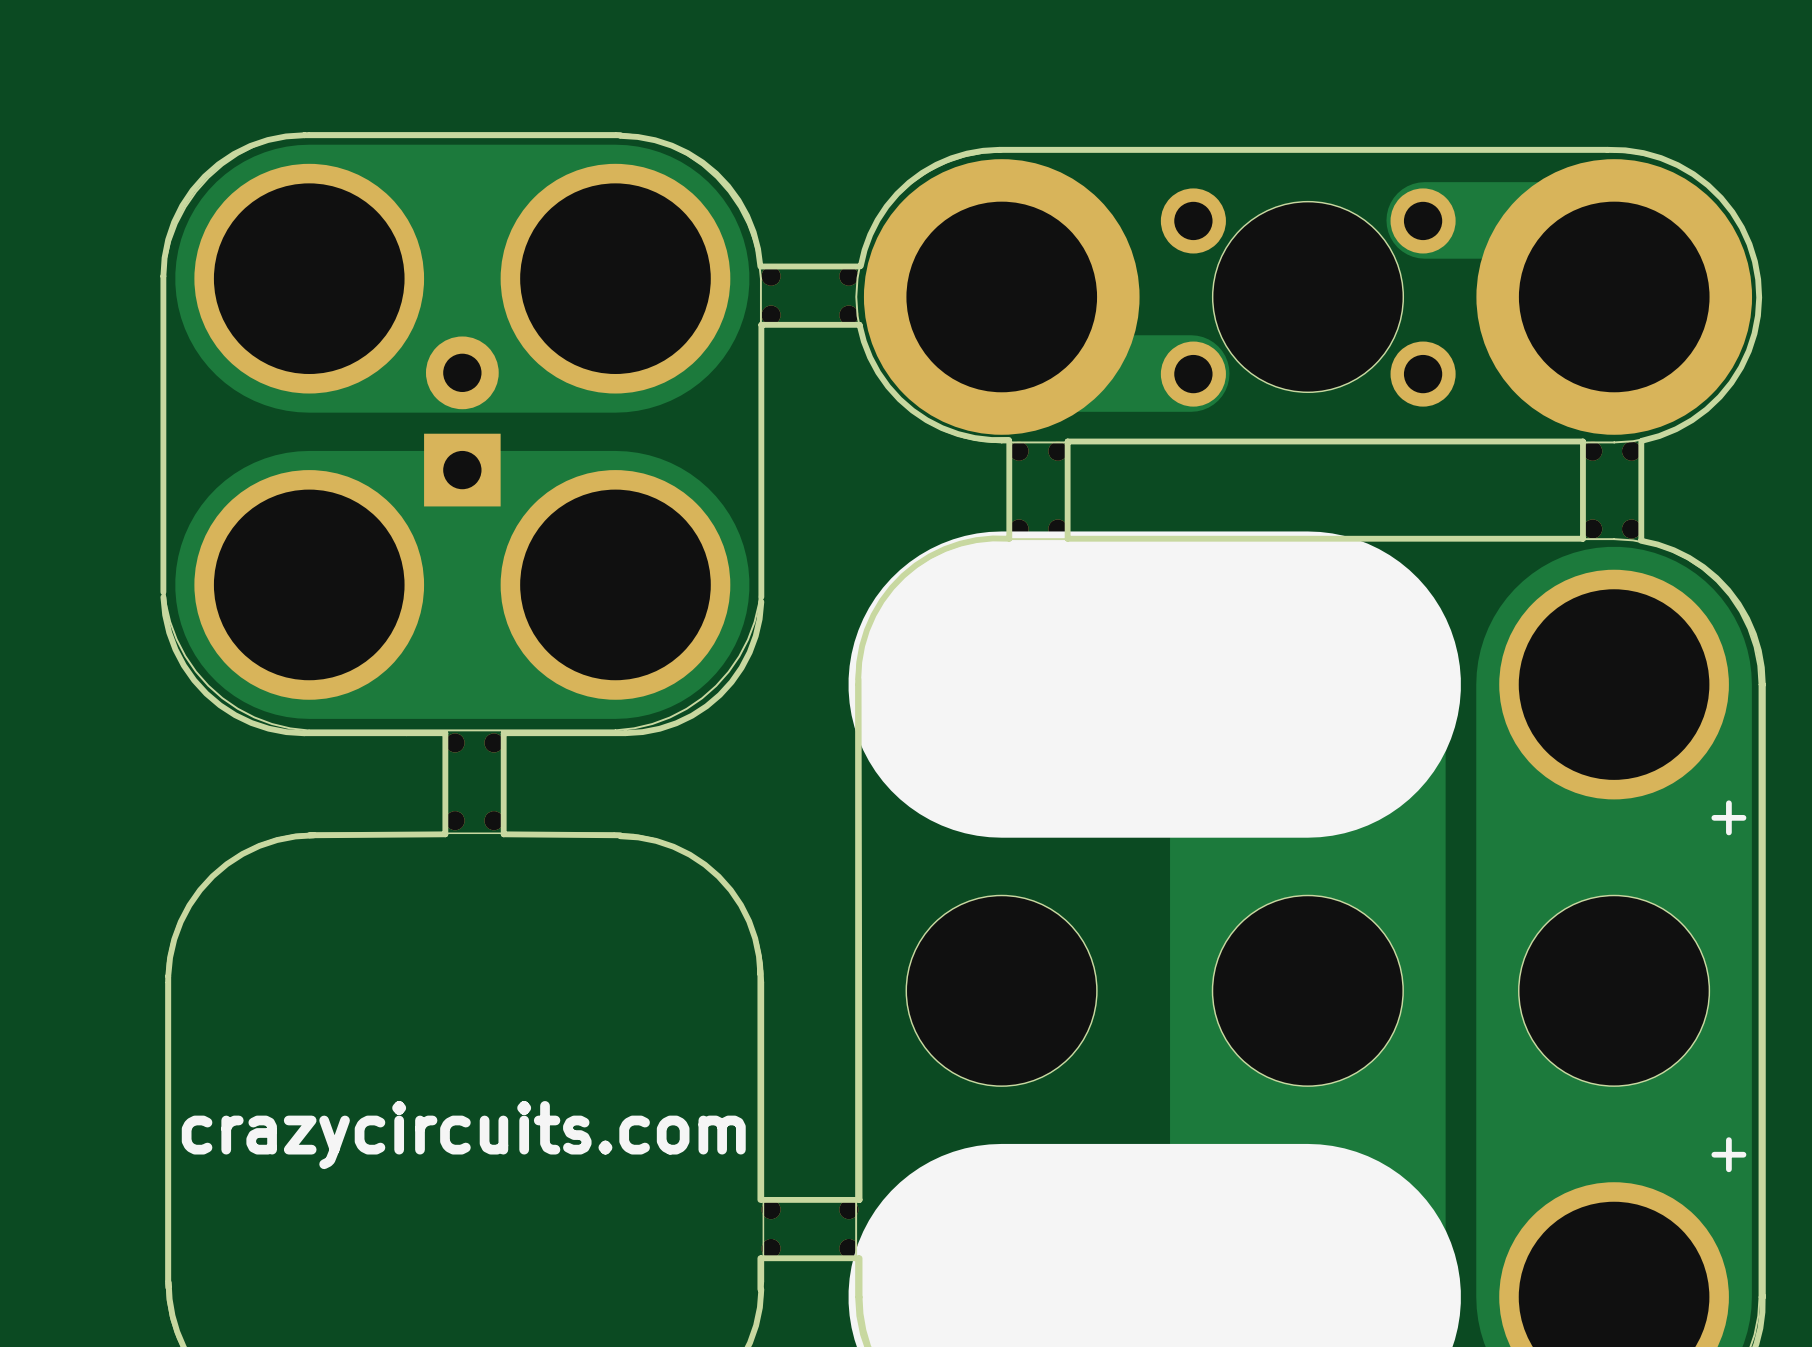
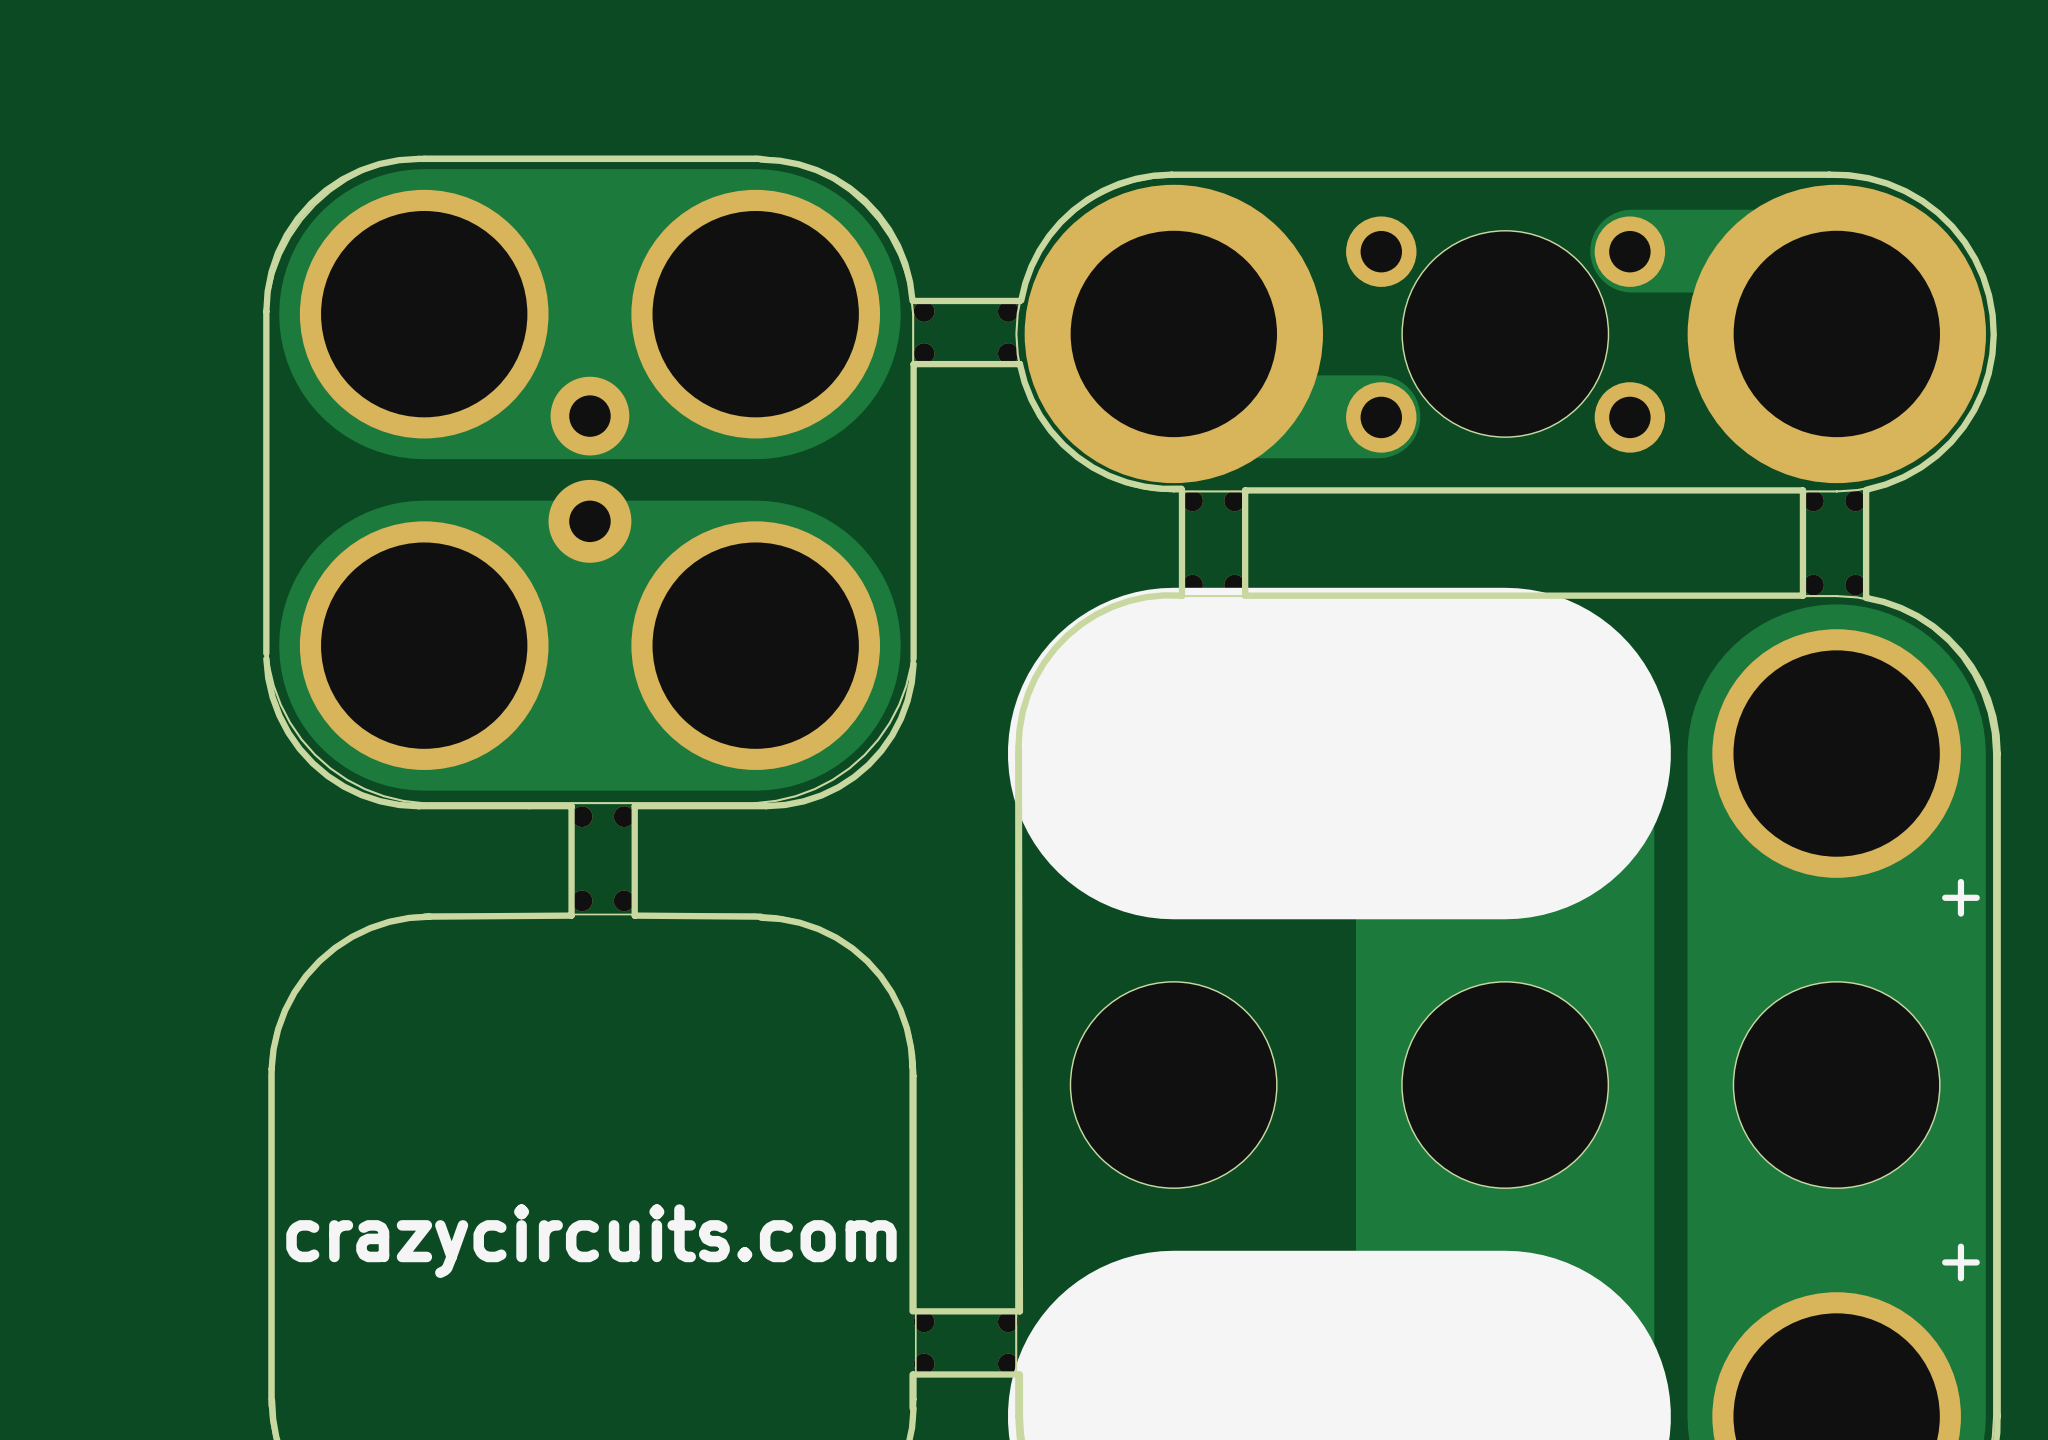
part footprint: [162, 132, 763, 732] -> [265, 155, 915, 805]

